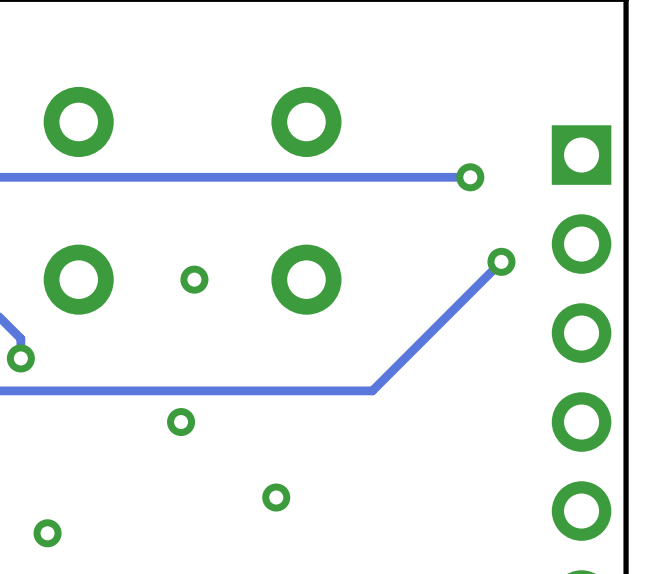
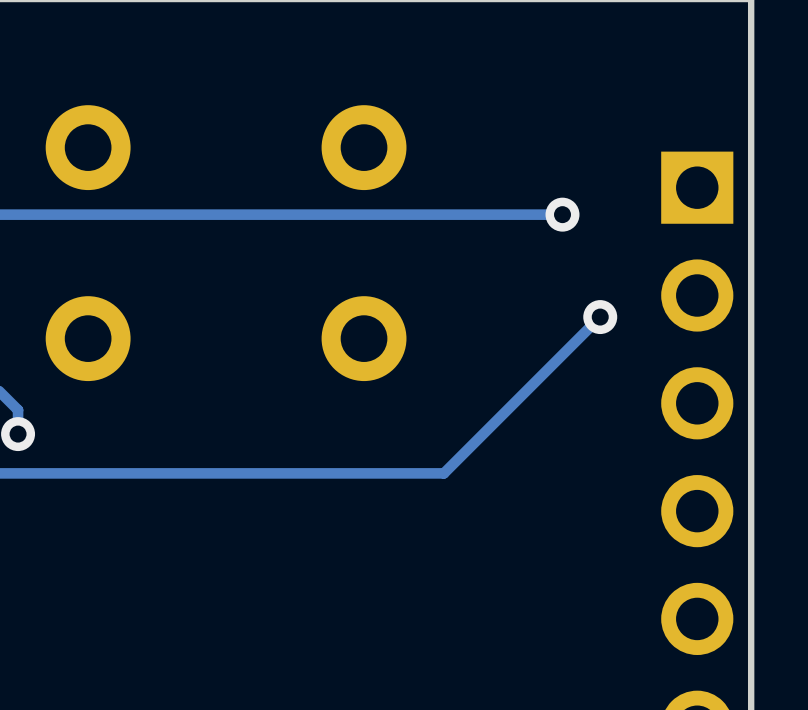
via: (194, 279) -> none
via: (181, 422) -> none
via: (276, 497) -> none
via: (47, 533) -> none

